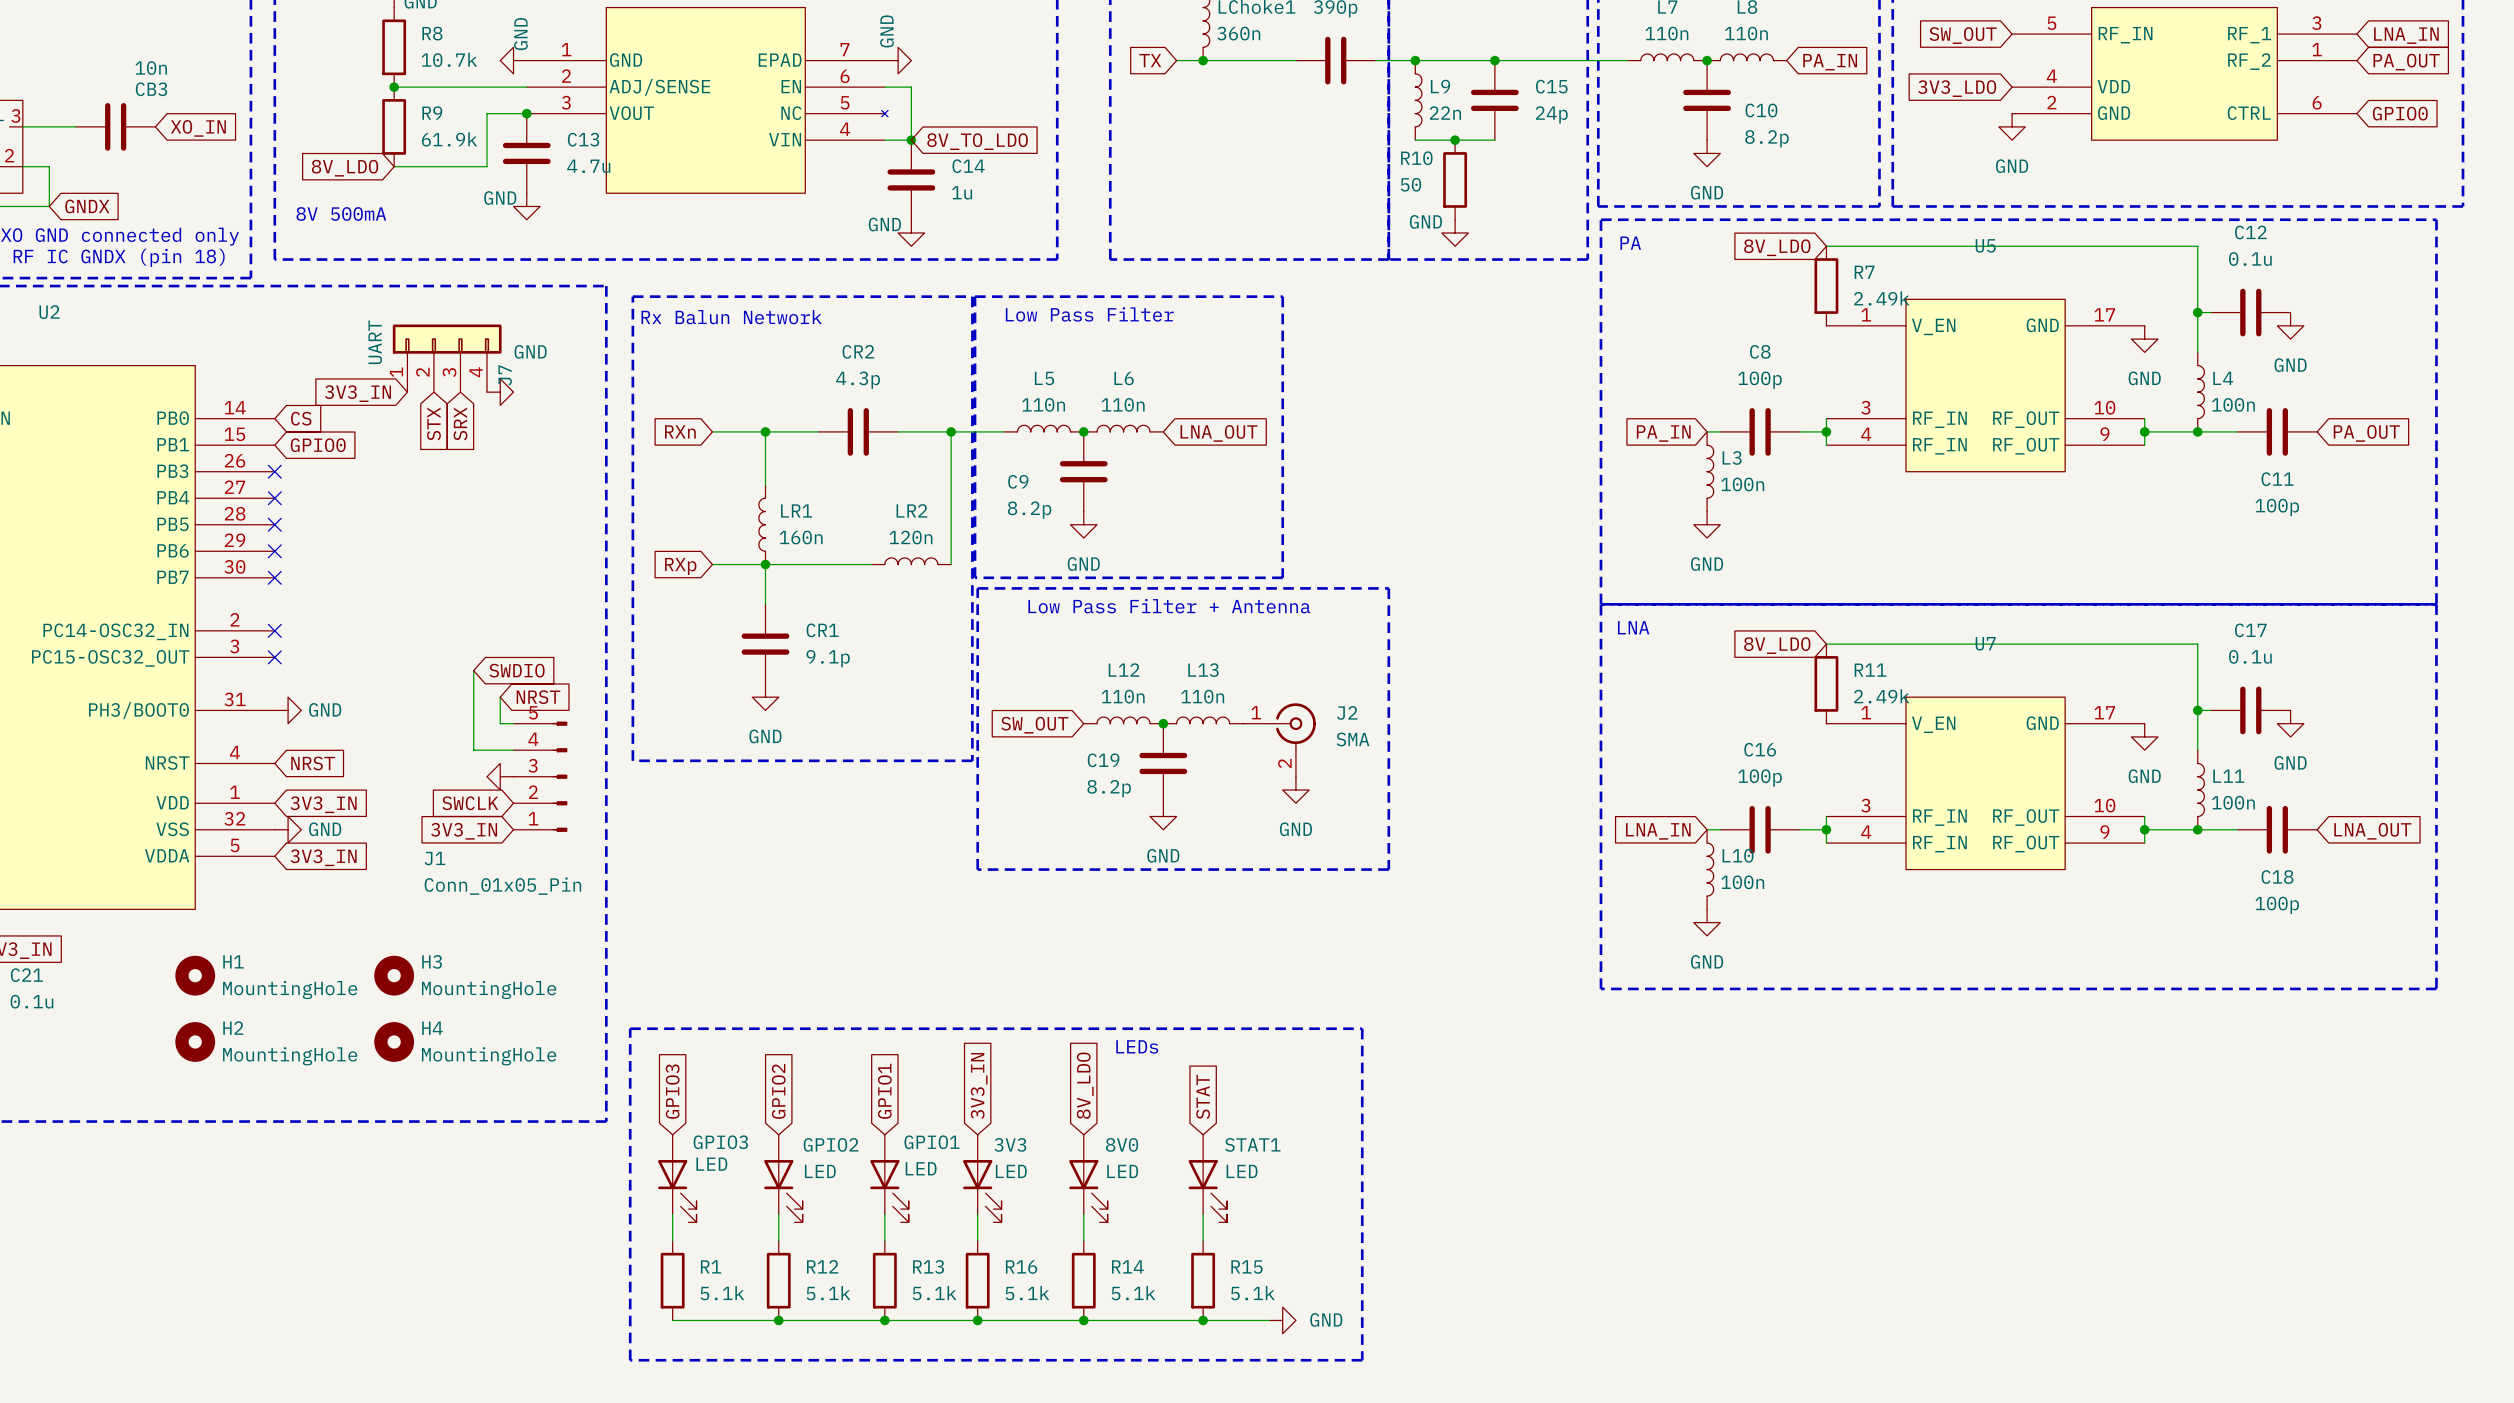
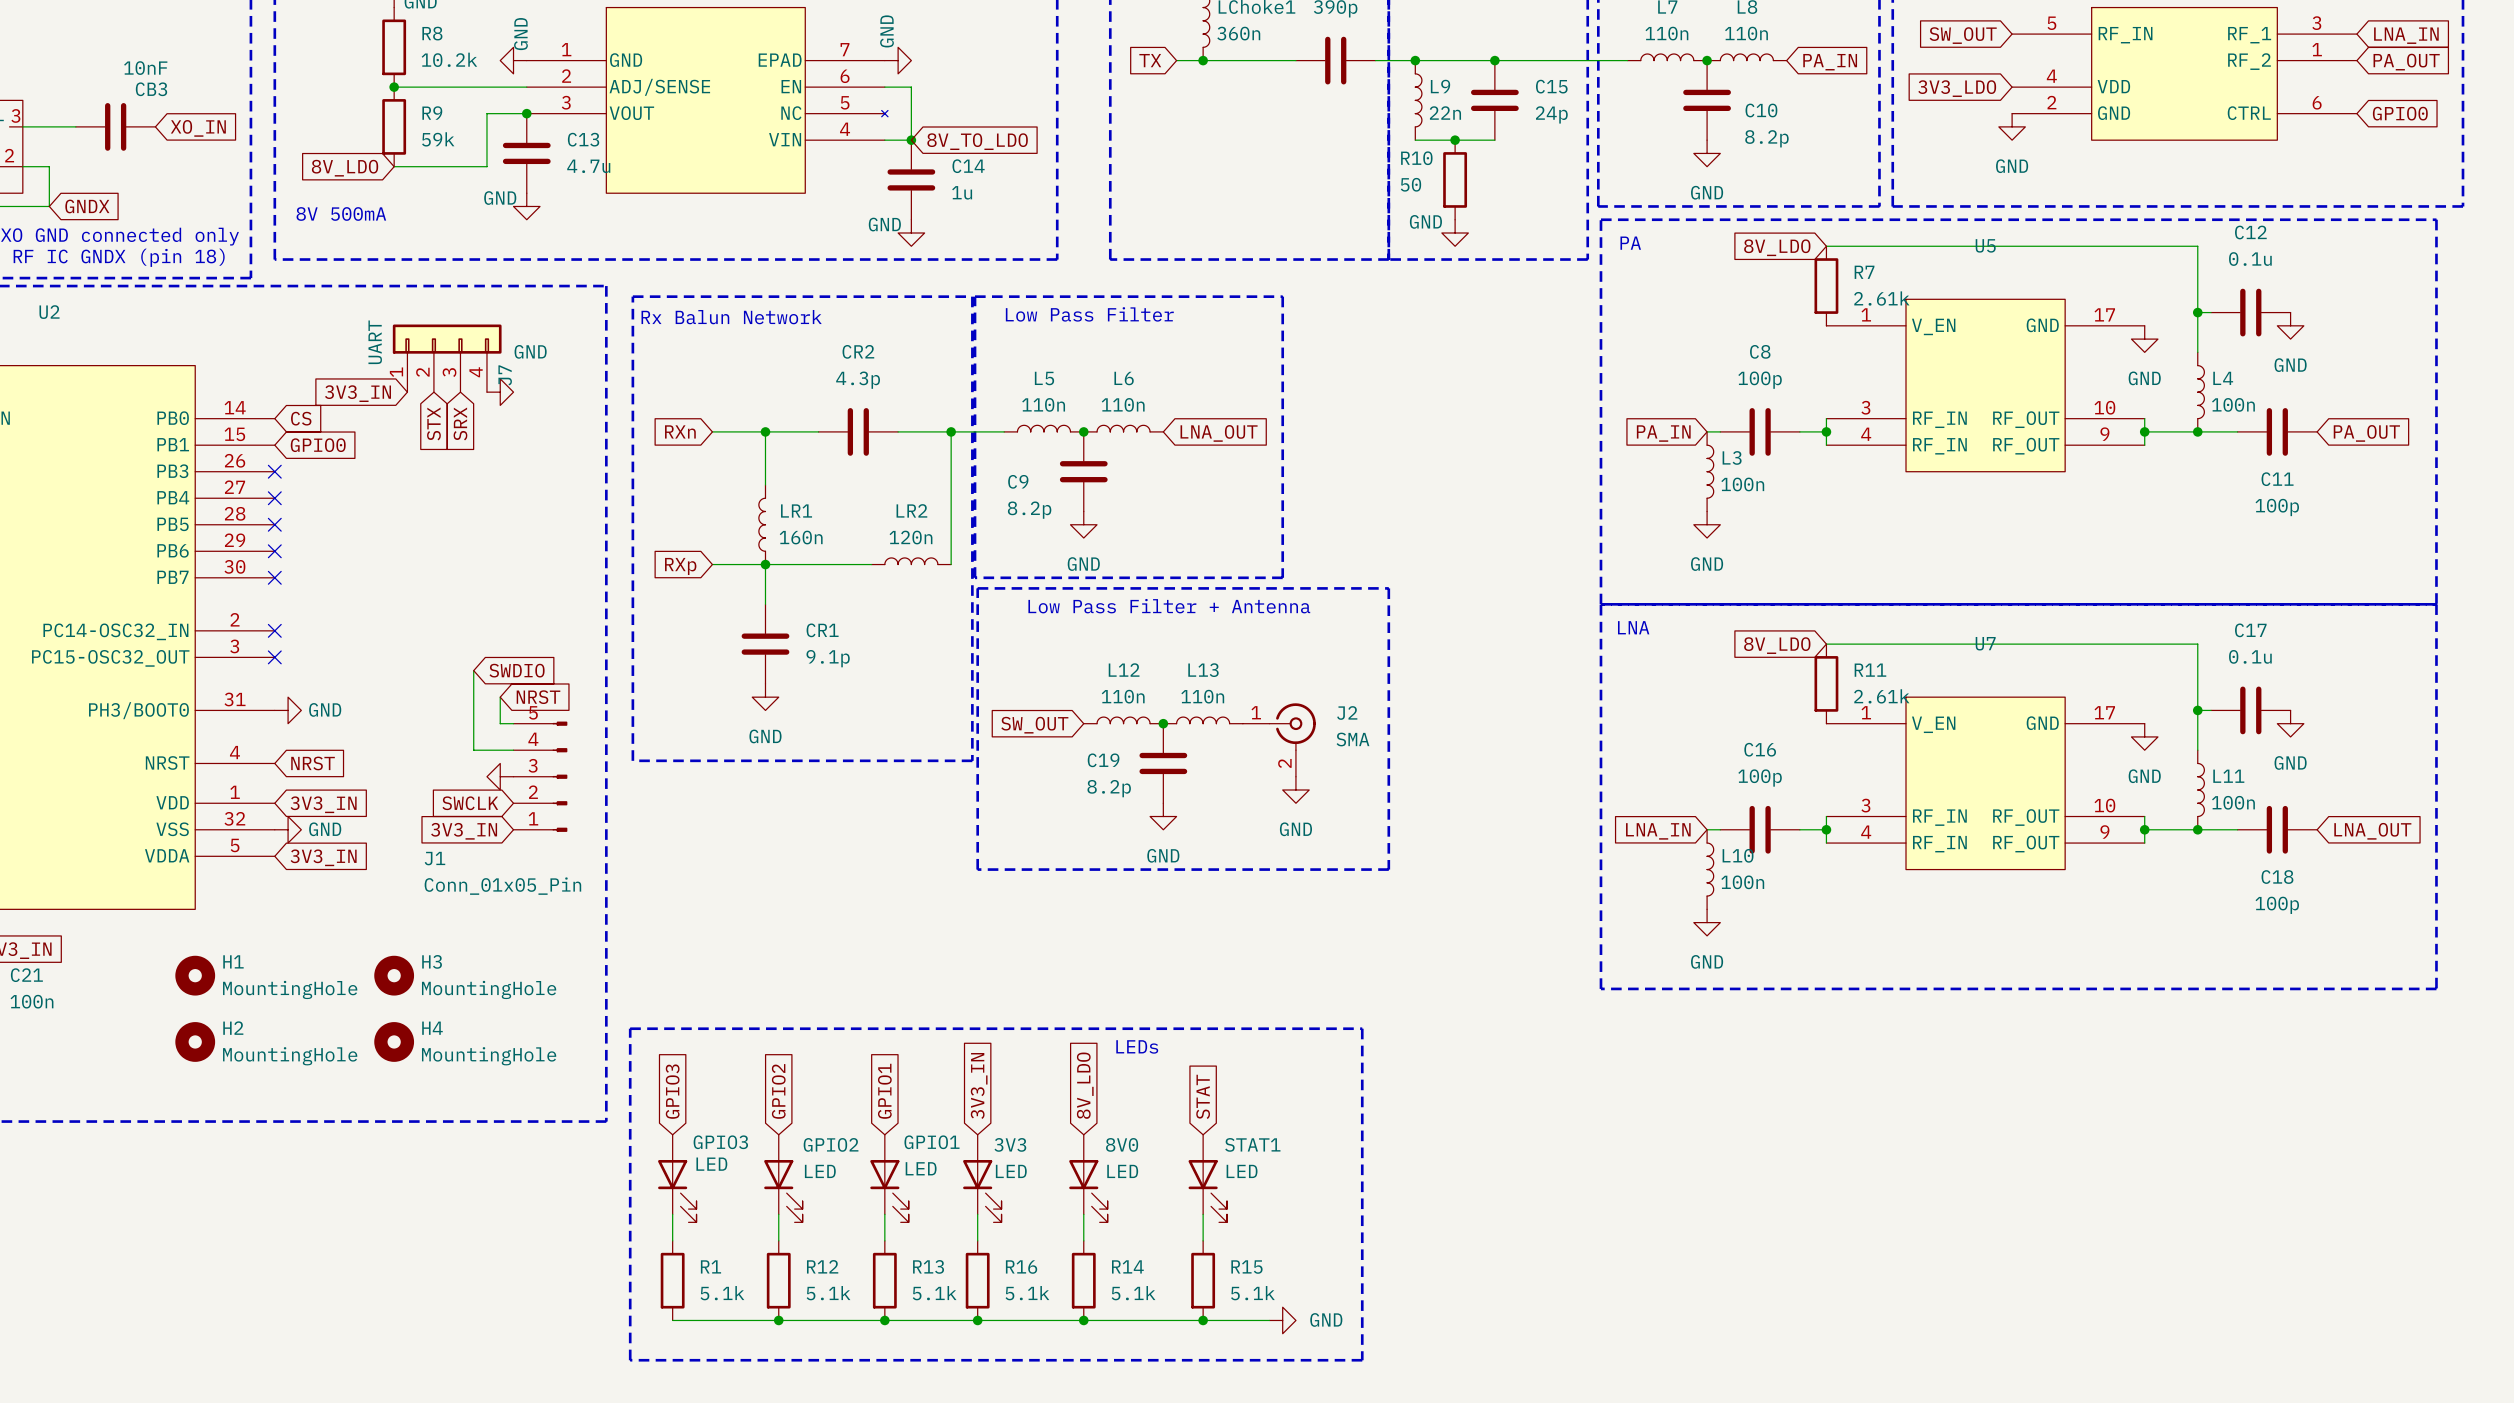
R8 value: 10.7k (449, 59) -> 10.2k (449, 59)
CB3 value: 10n (151, 68) -> 10nF (145, 68)
R9 value: 61.9k (449, 139) -> 59k (438, 139)
R7 value: 2.49k (1881, 298) -> 2.61k (1881, 298)
R11 value: 2.49k (1881, 696) -> 2.61k (1881, 696)
C21 value: 0.1u (31, 1001) -> 100n (31, 1001)

